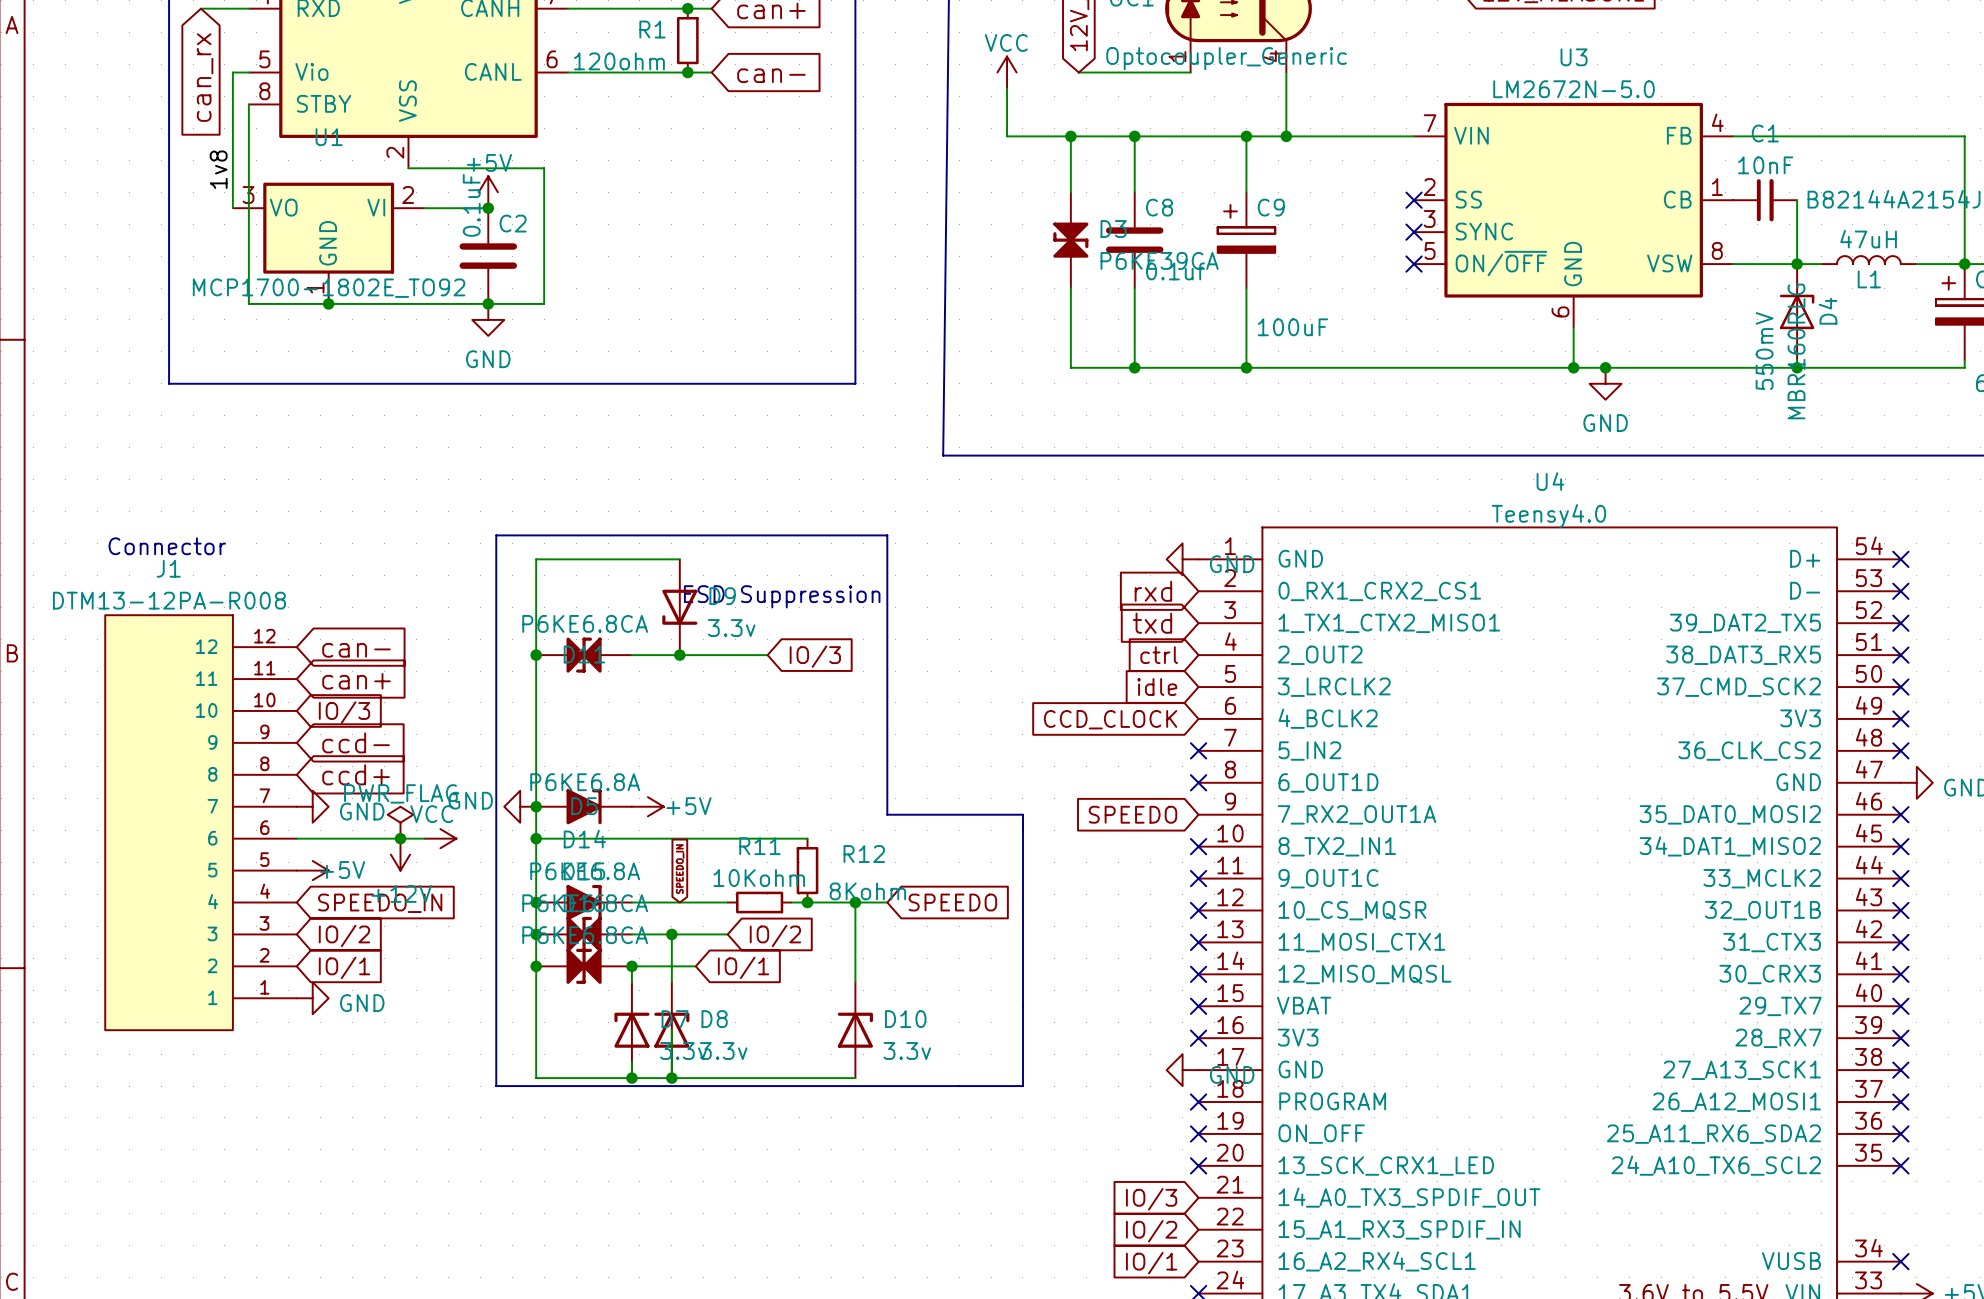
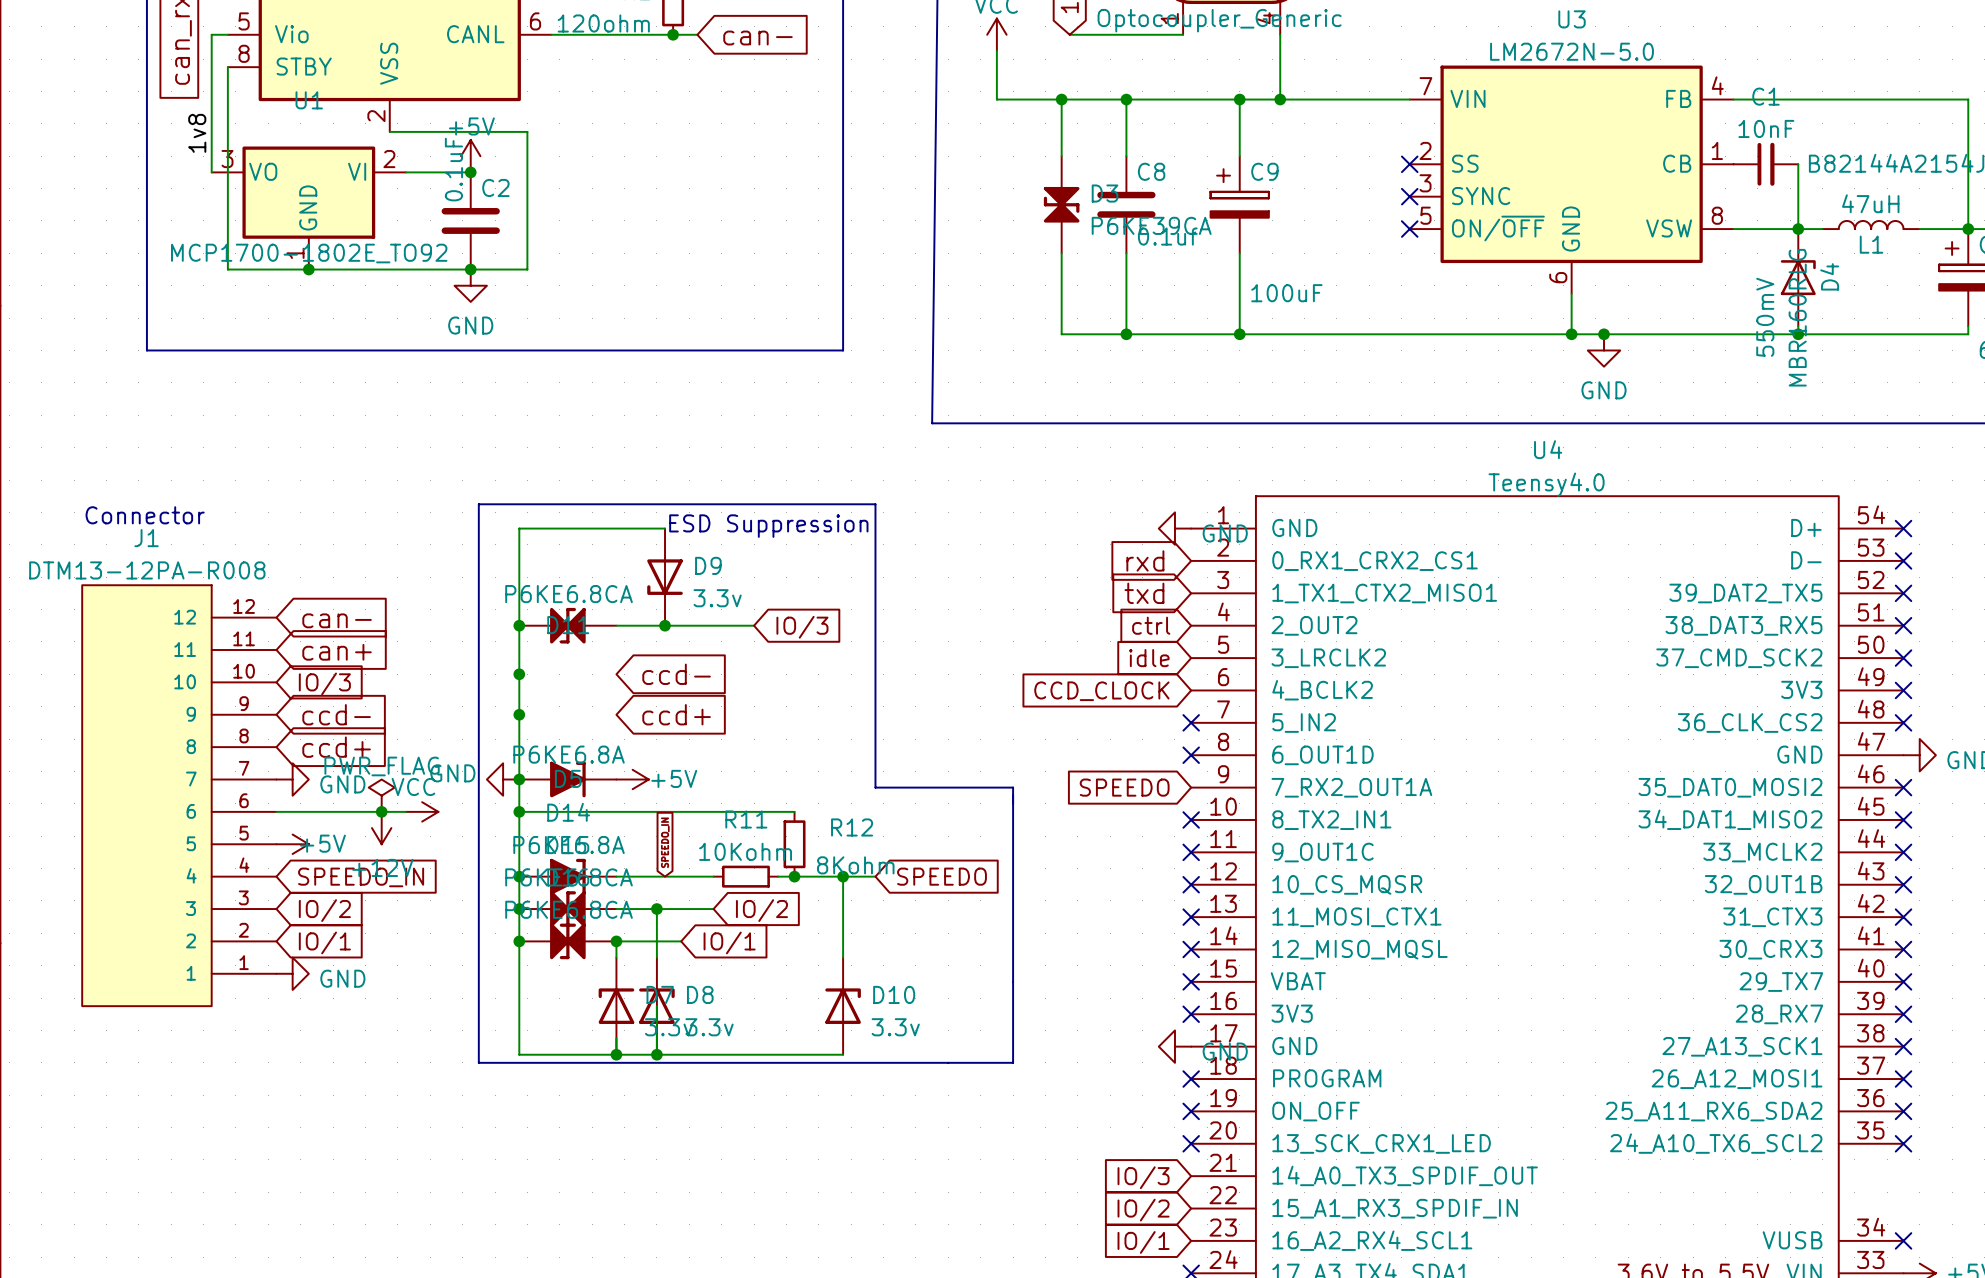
text position: ESD Suppression (782, 596) -> ESD Suppression (768, 526)
junction: none -> (519, 674)
global label: none -> ccd- (676, 674)
junction: none -> (519, 714)
global label: none -> ccd+ (676, 714)

